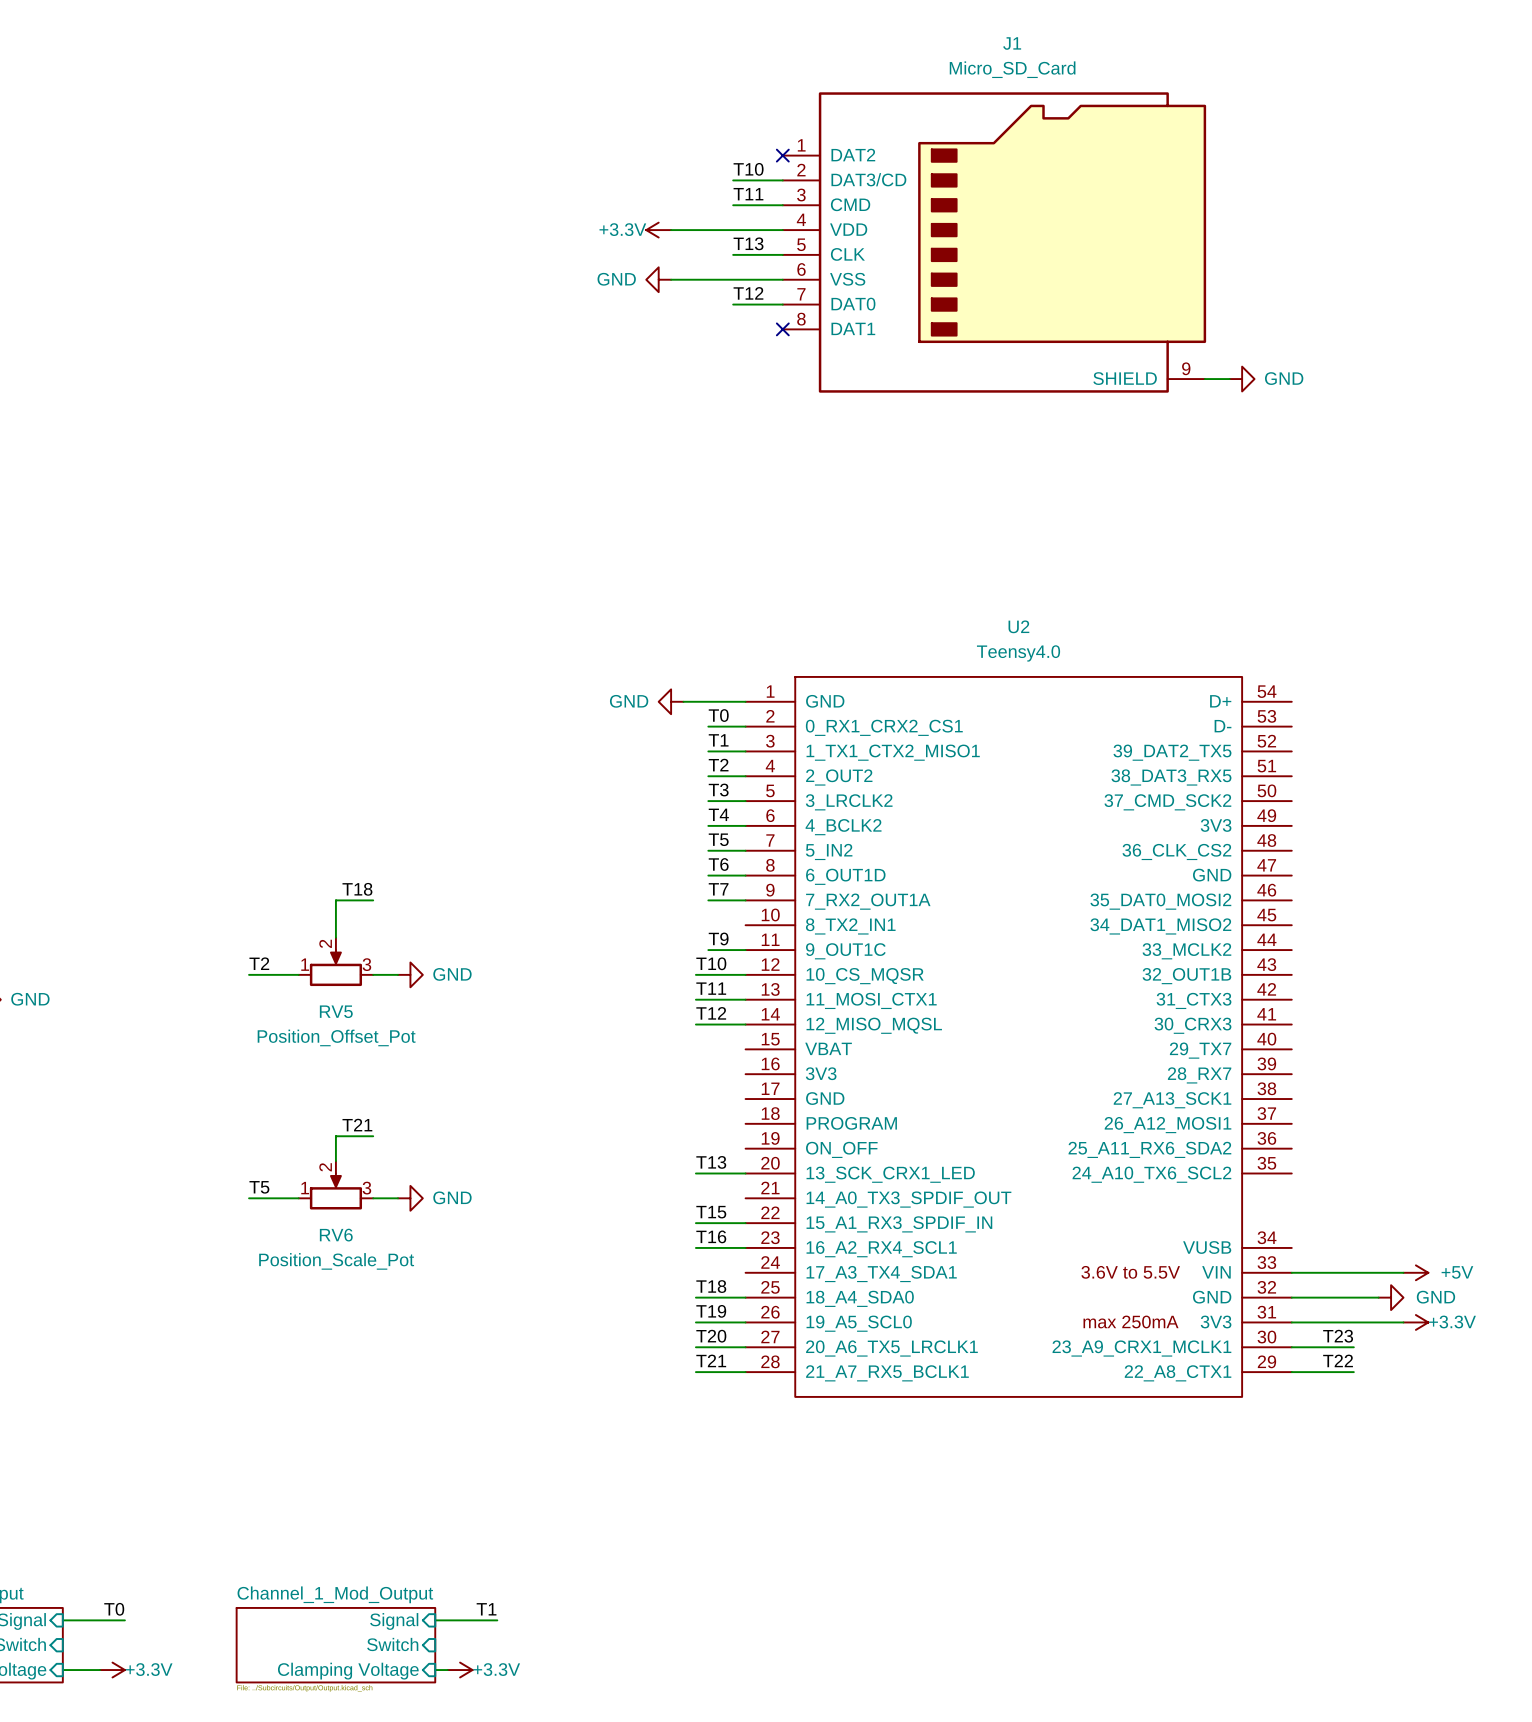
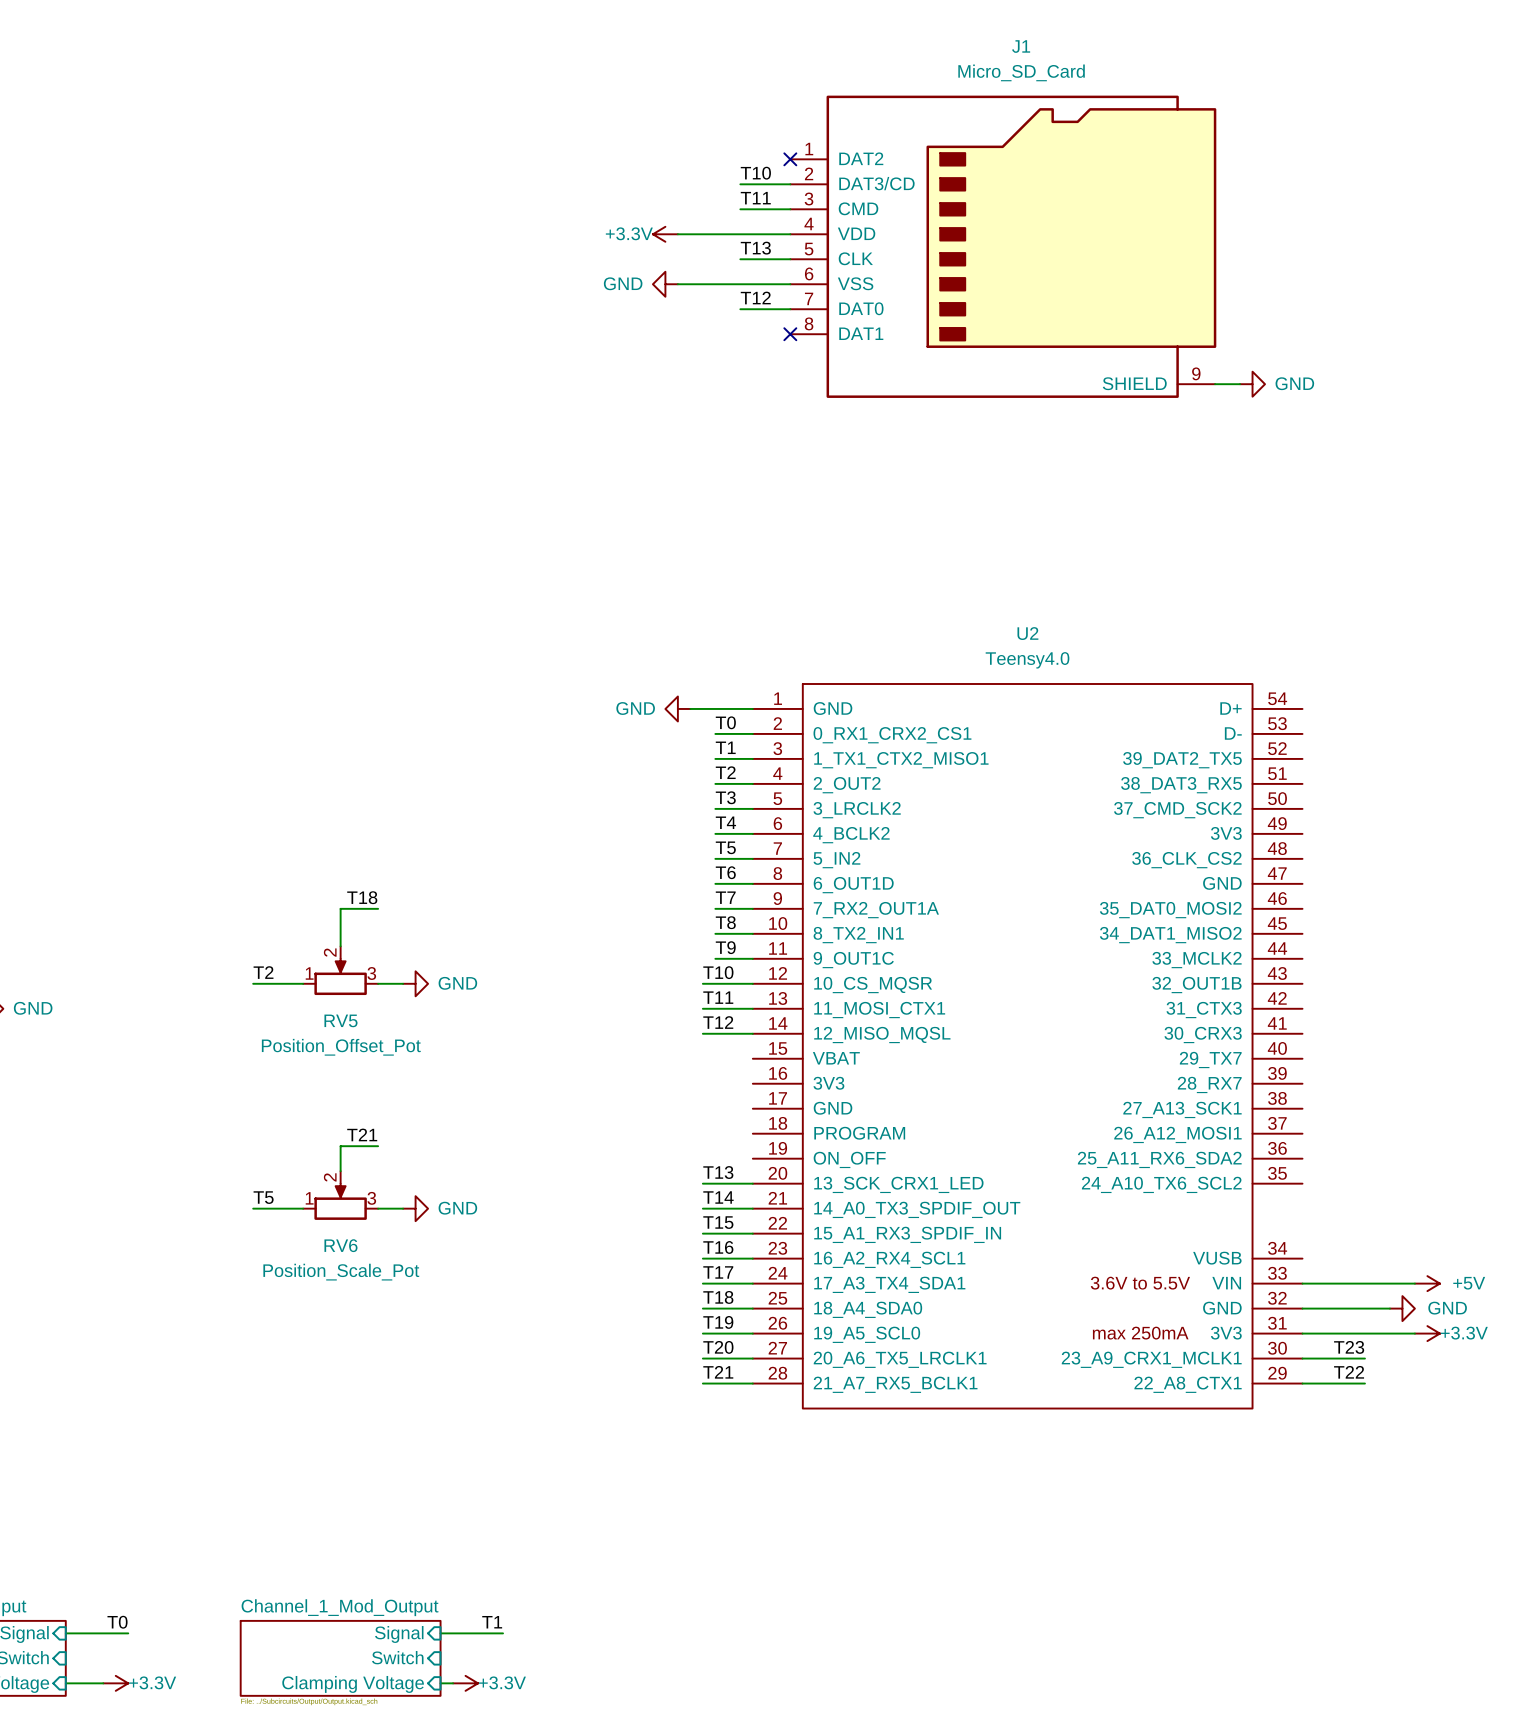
label: none -> T8 (725, 922)
wire: none -> (715, 933) (752, 933)
label: none -> T14 (718, 1197)
wire: none -> (702, 1208) (752, 1208)
label: none -> T17 (718, 1272)
wire: none -> (702, 1283) (752, 1283)

